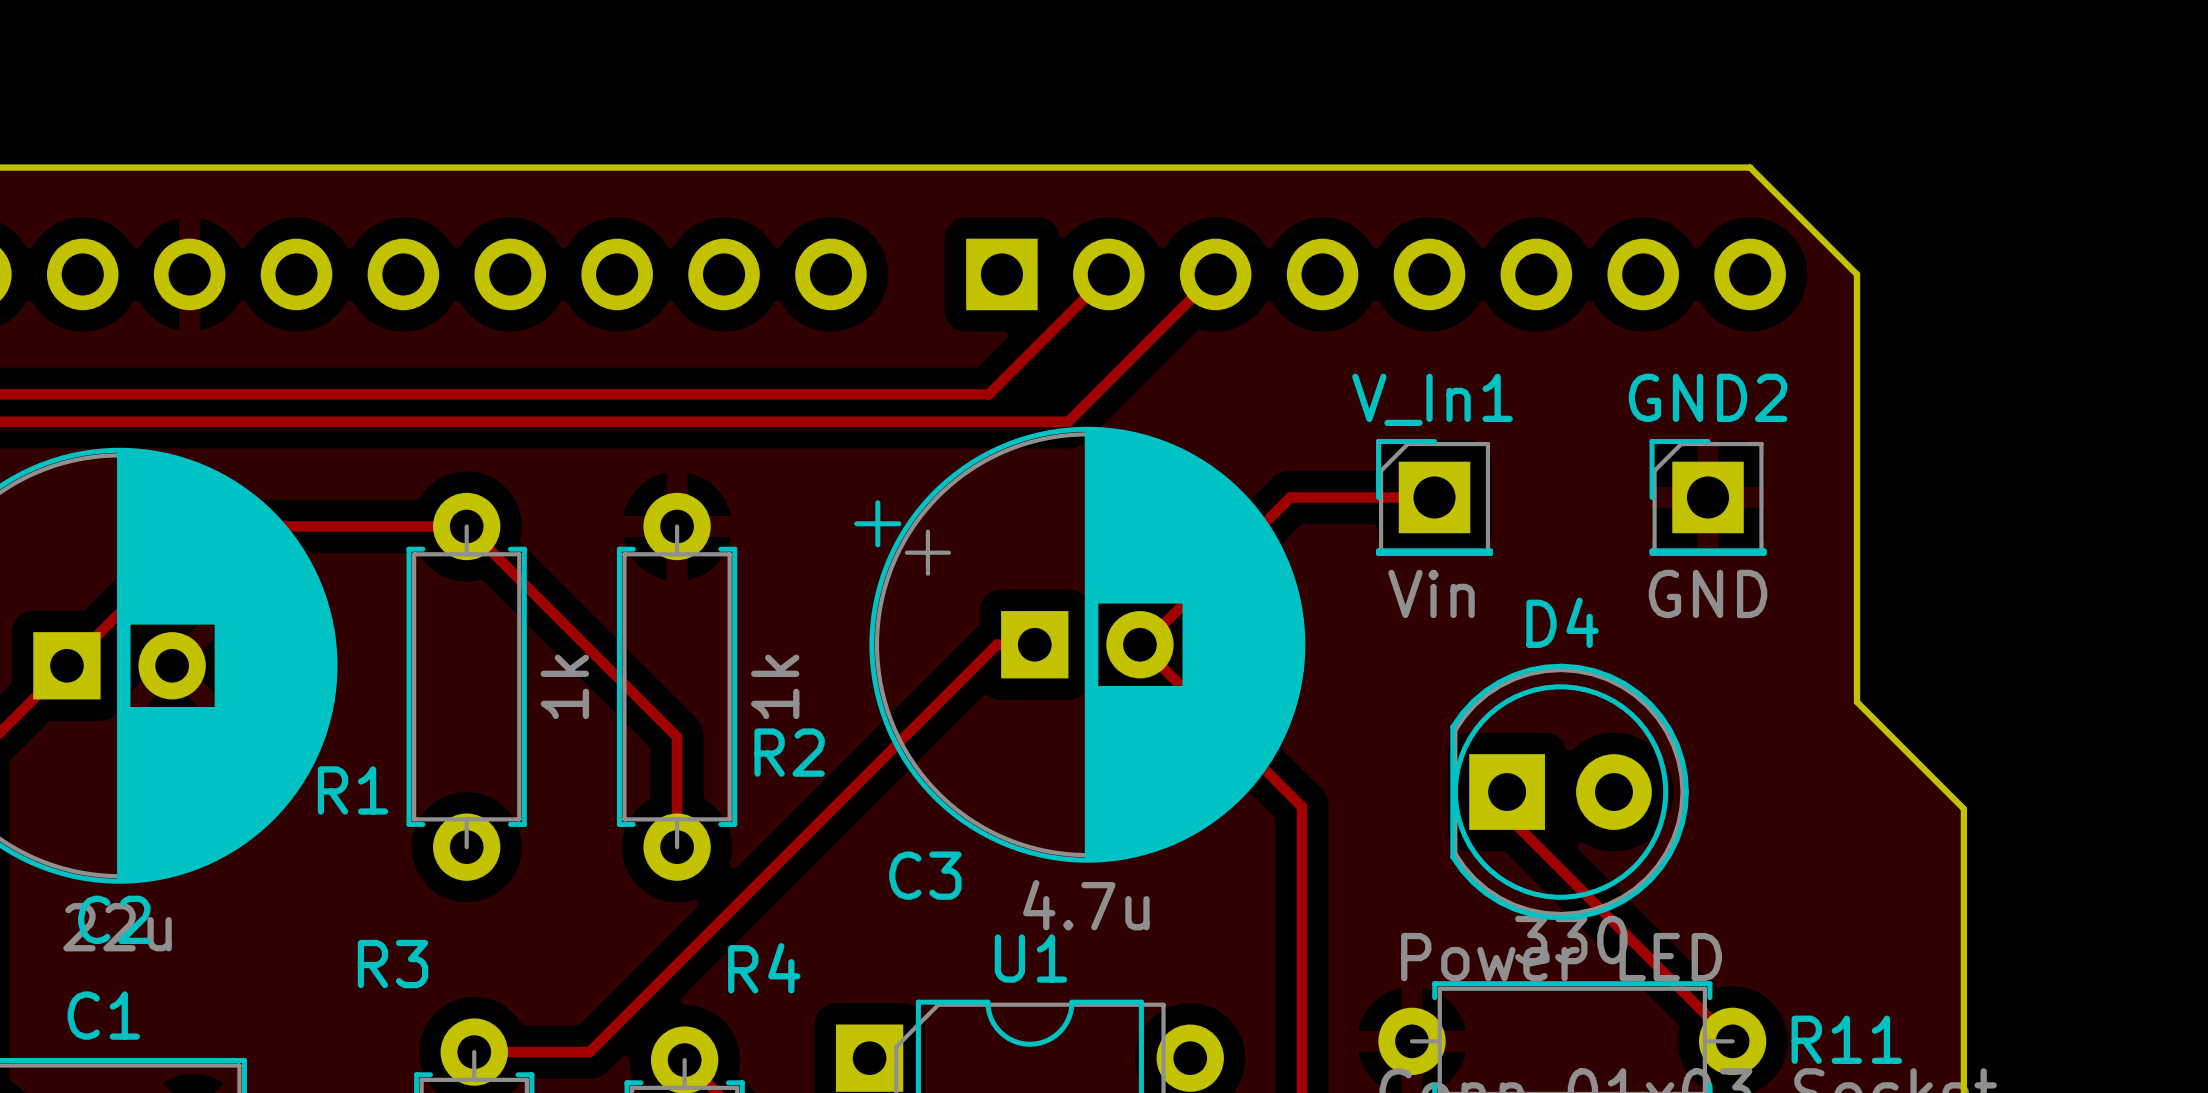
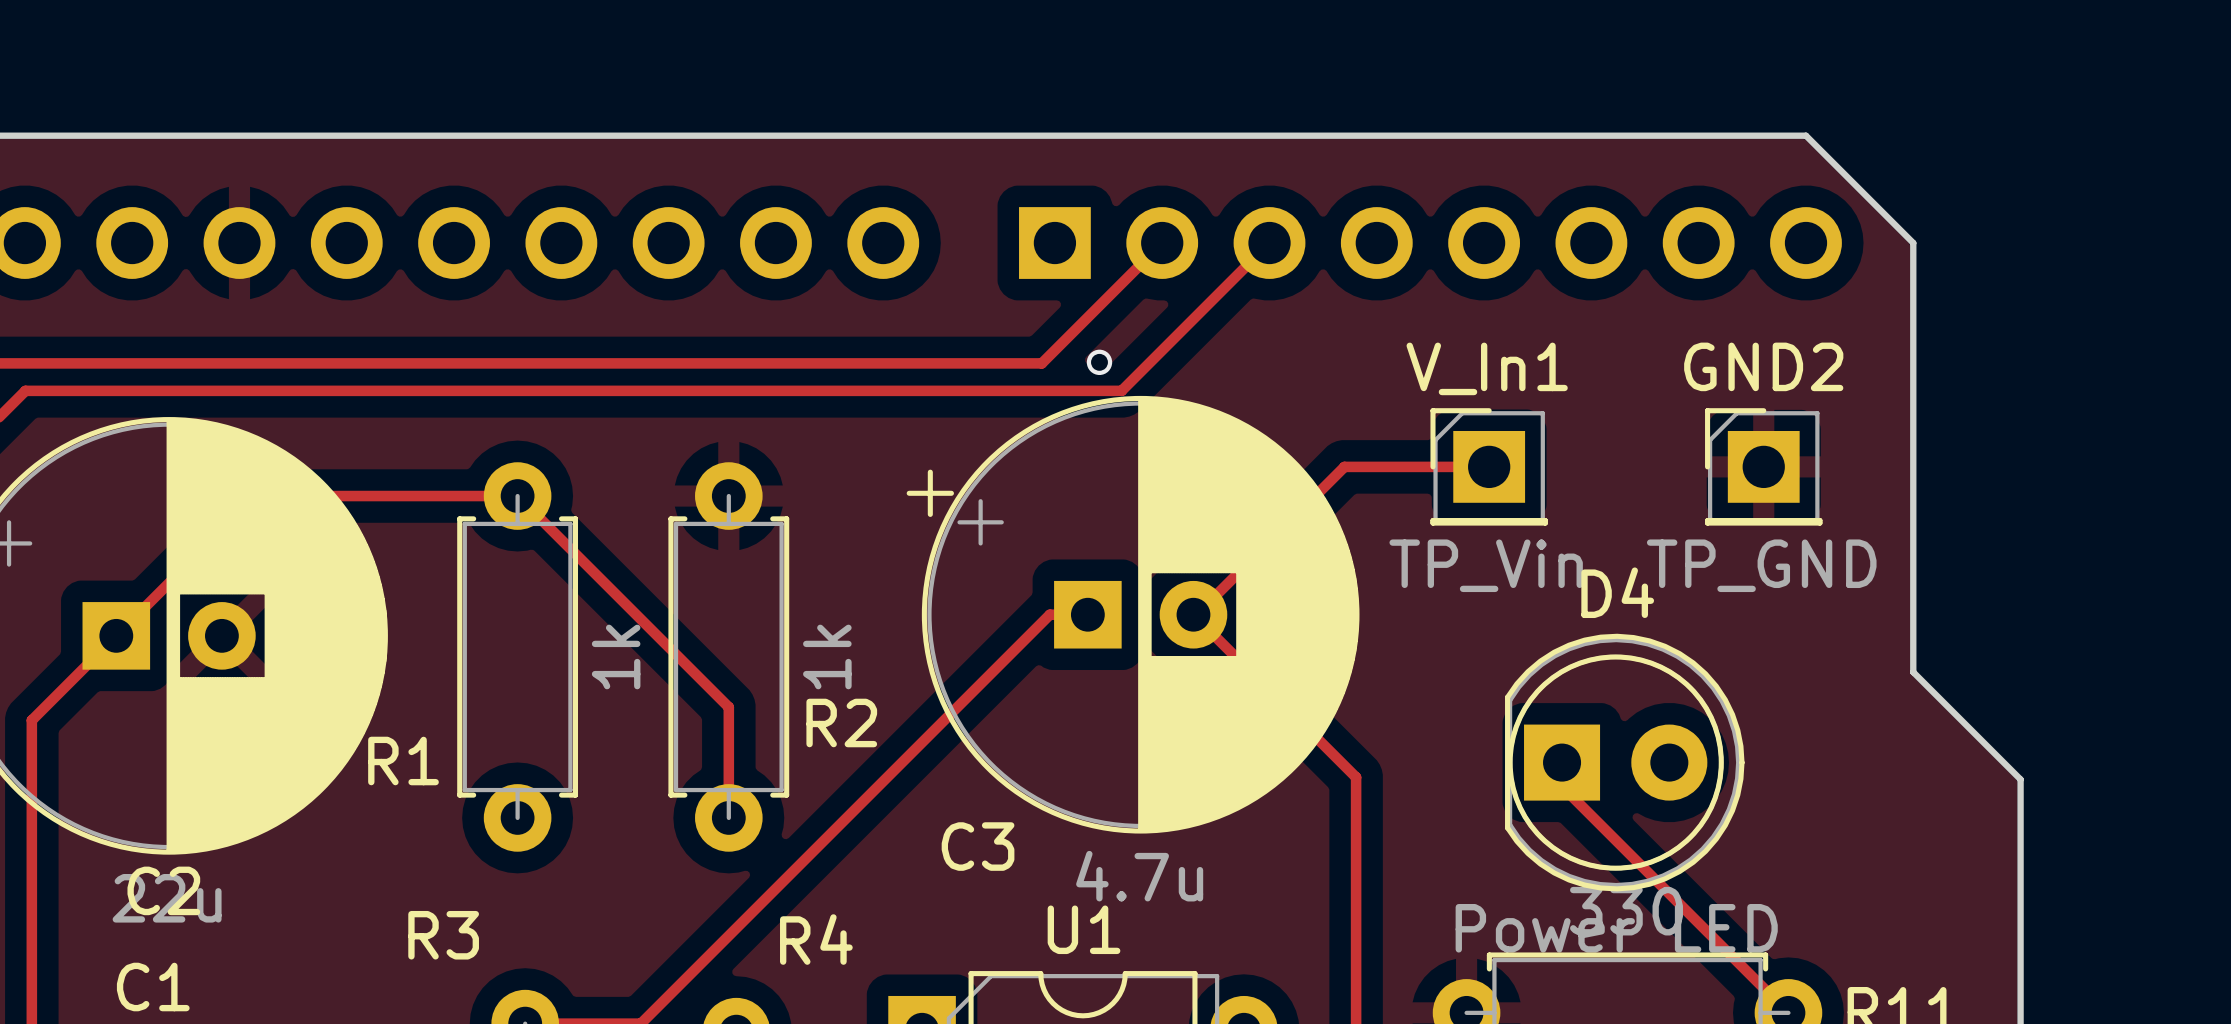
via: none -> (1099, 362)
V_In1 value: Vin (1431, 593) -> TP_Vin (1486, 565)
GND2 value: GND (1708, 593) -> TP_GND (1761, 565)

